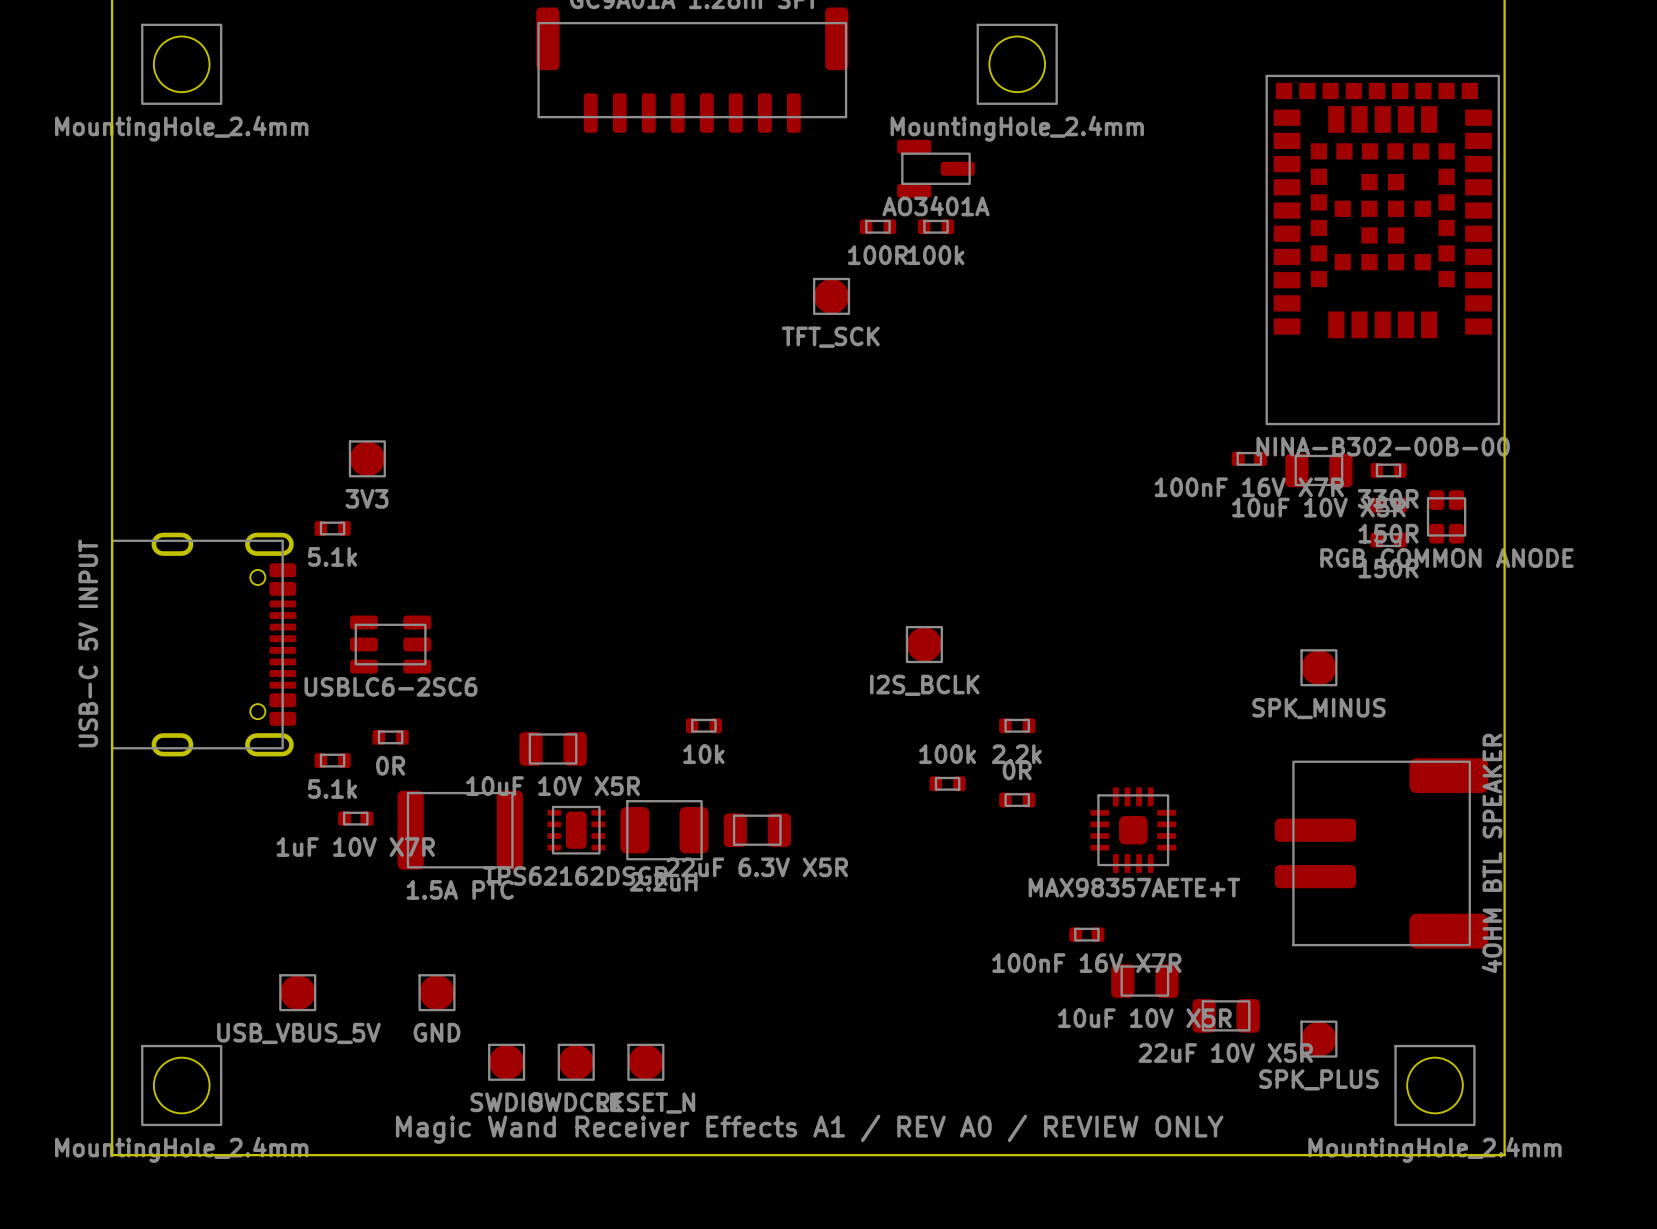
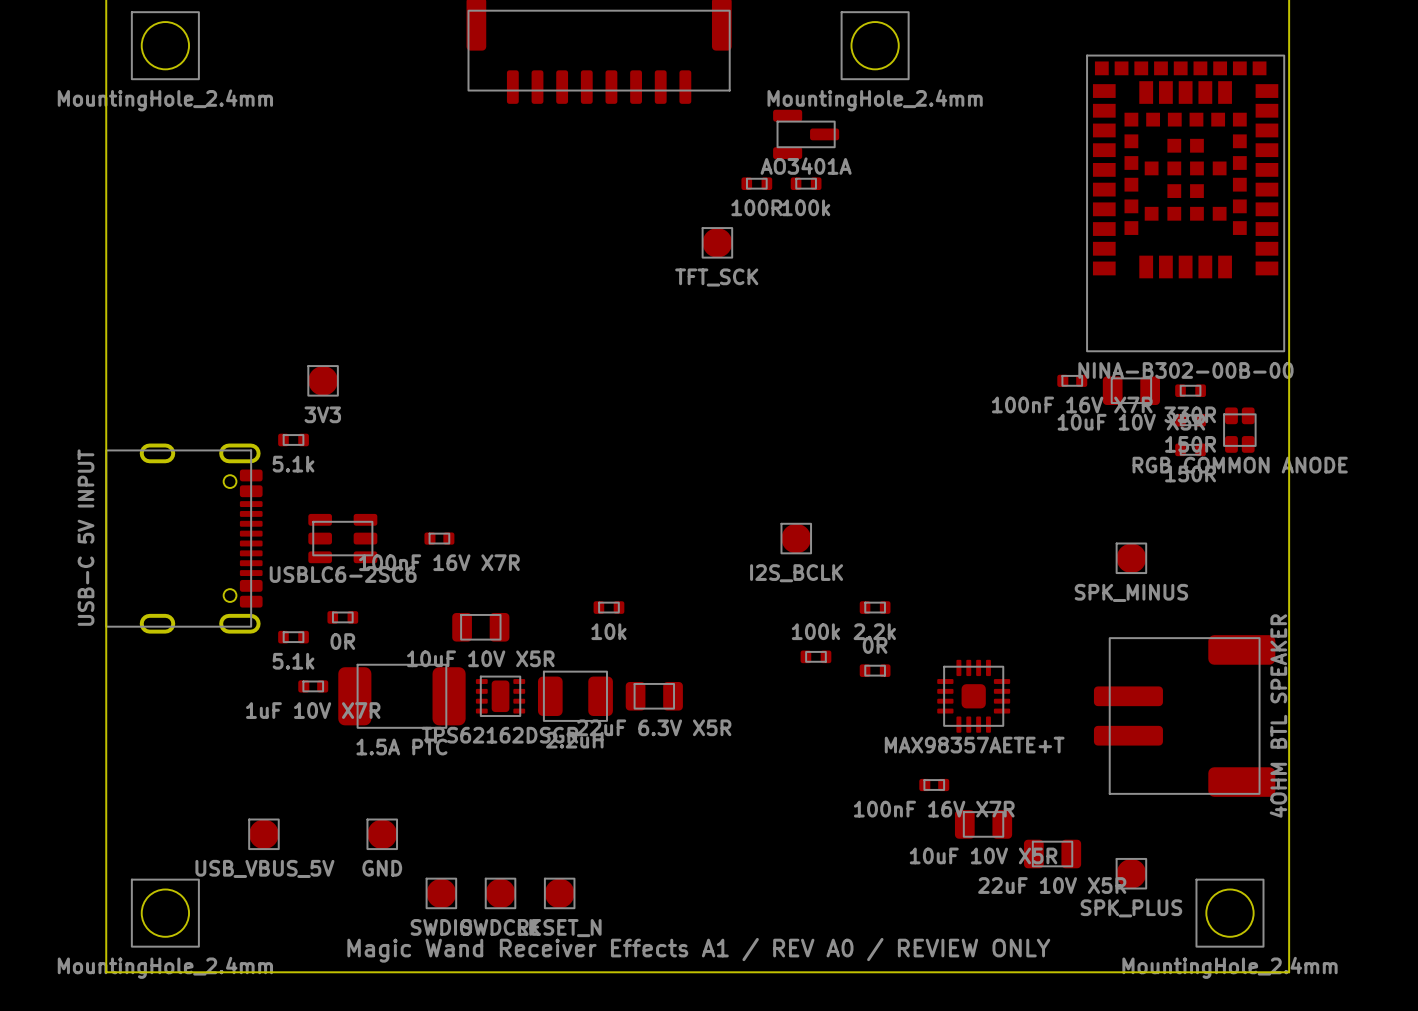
part: none -> 100nF 16V X7R (439, 538)
part footprint: [397, 790, 523, 870] -> [338, 663, 466, 729]

